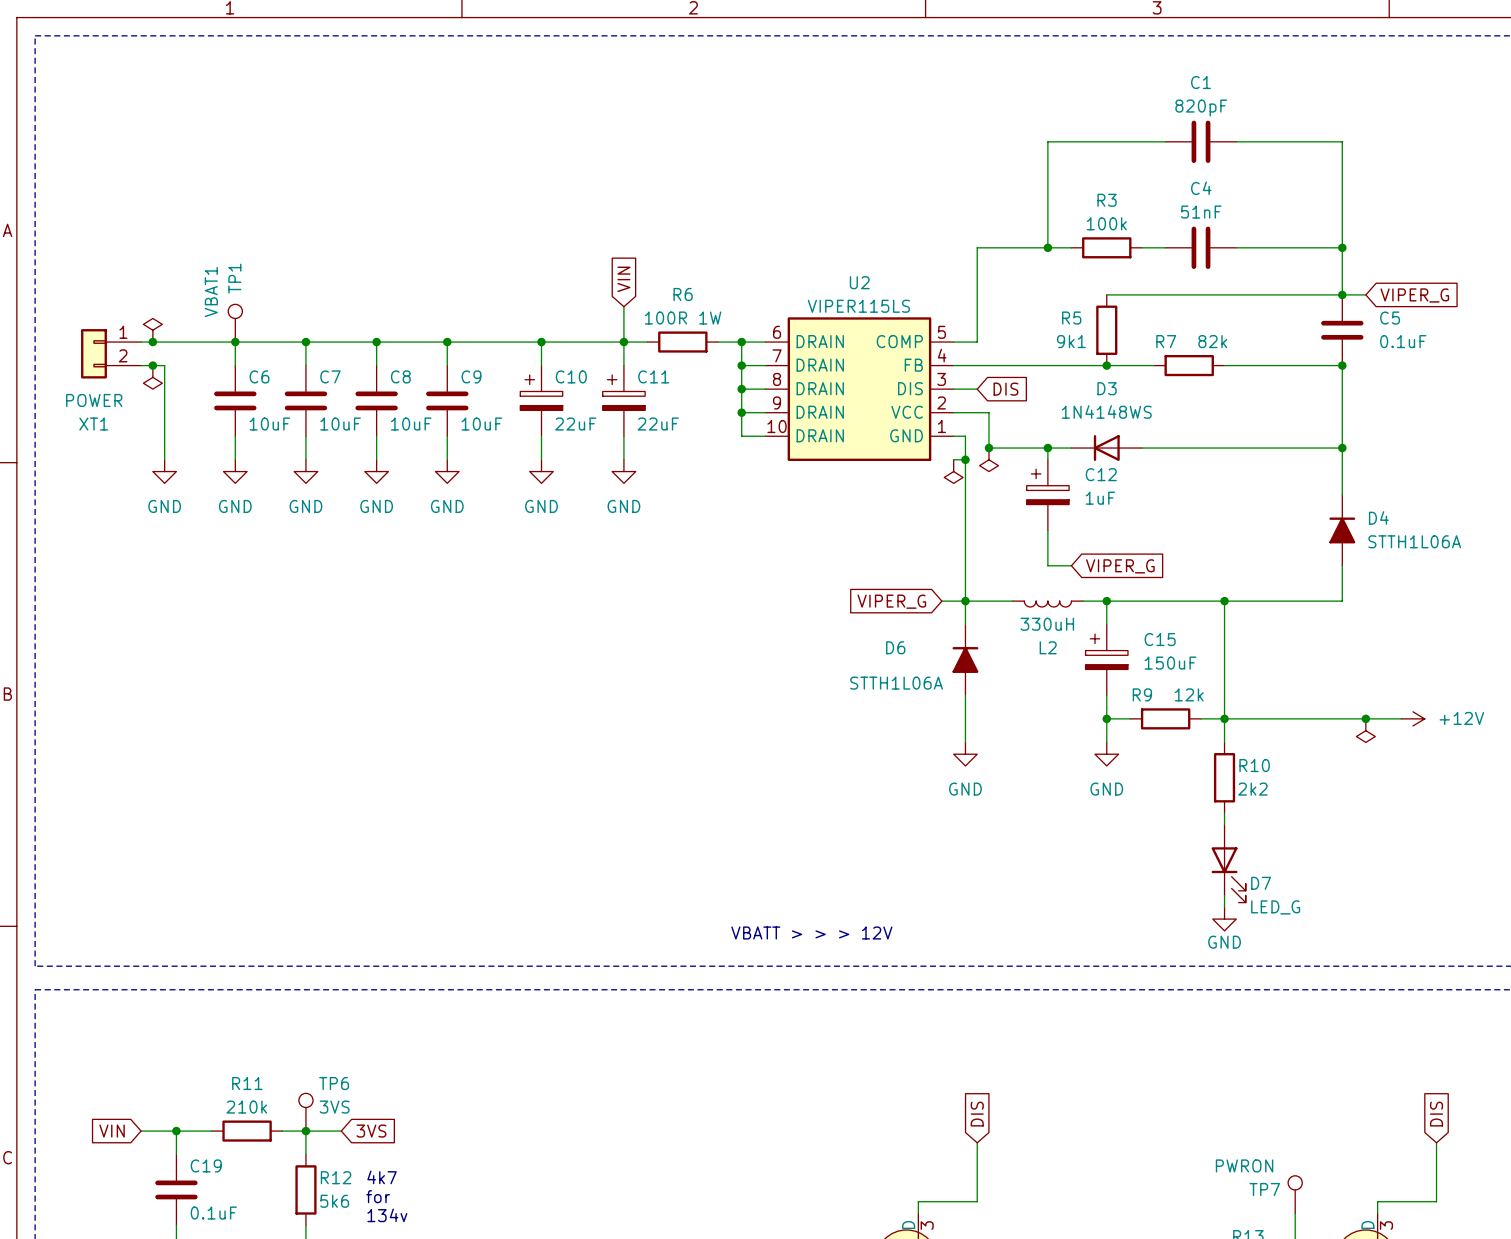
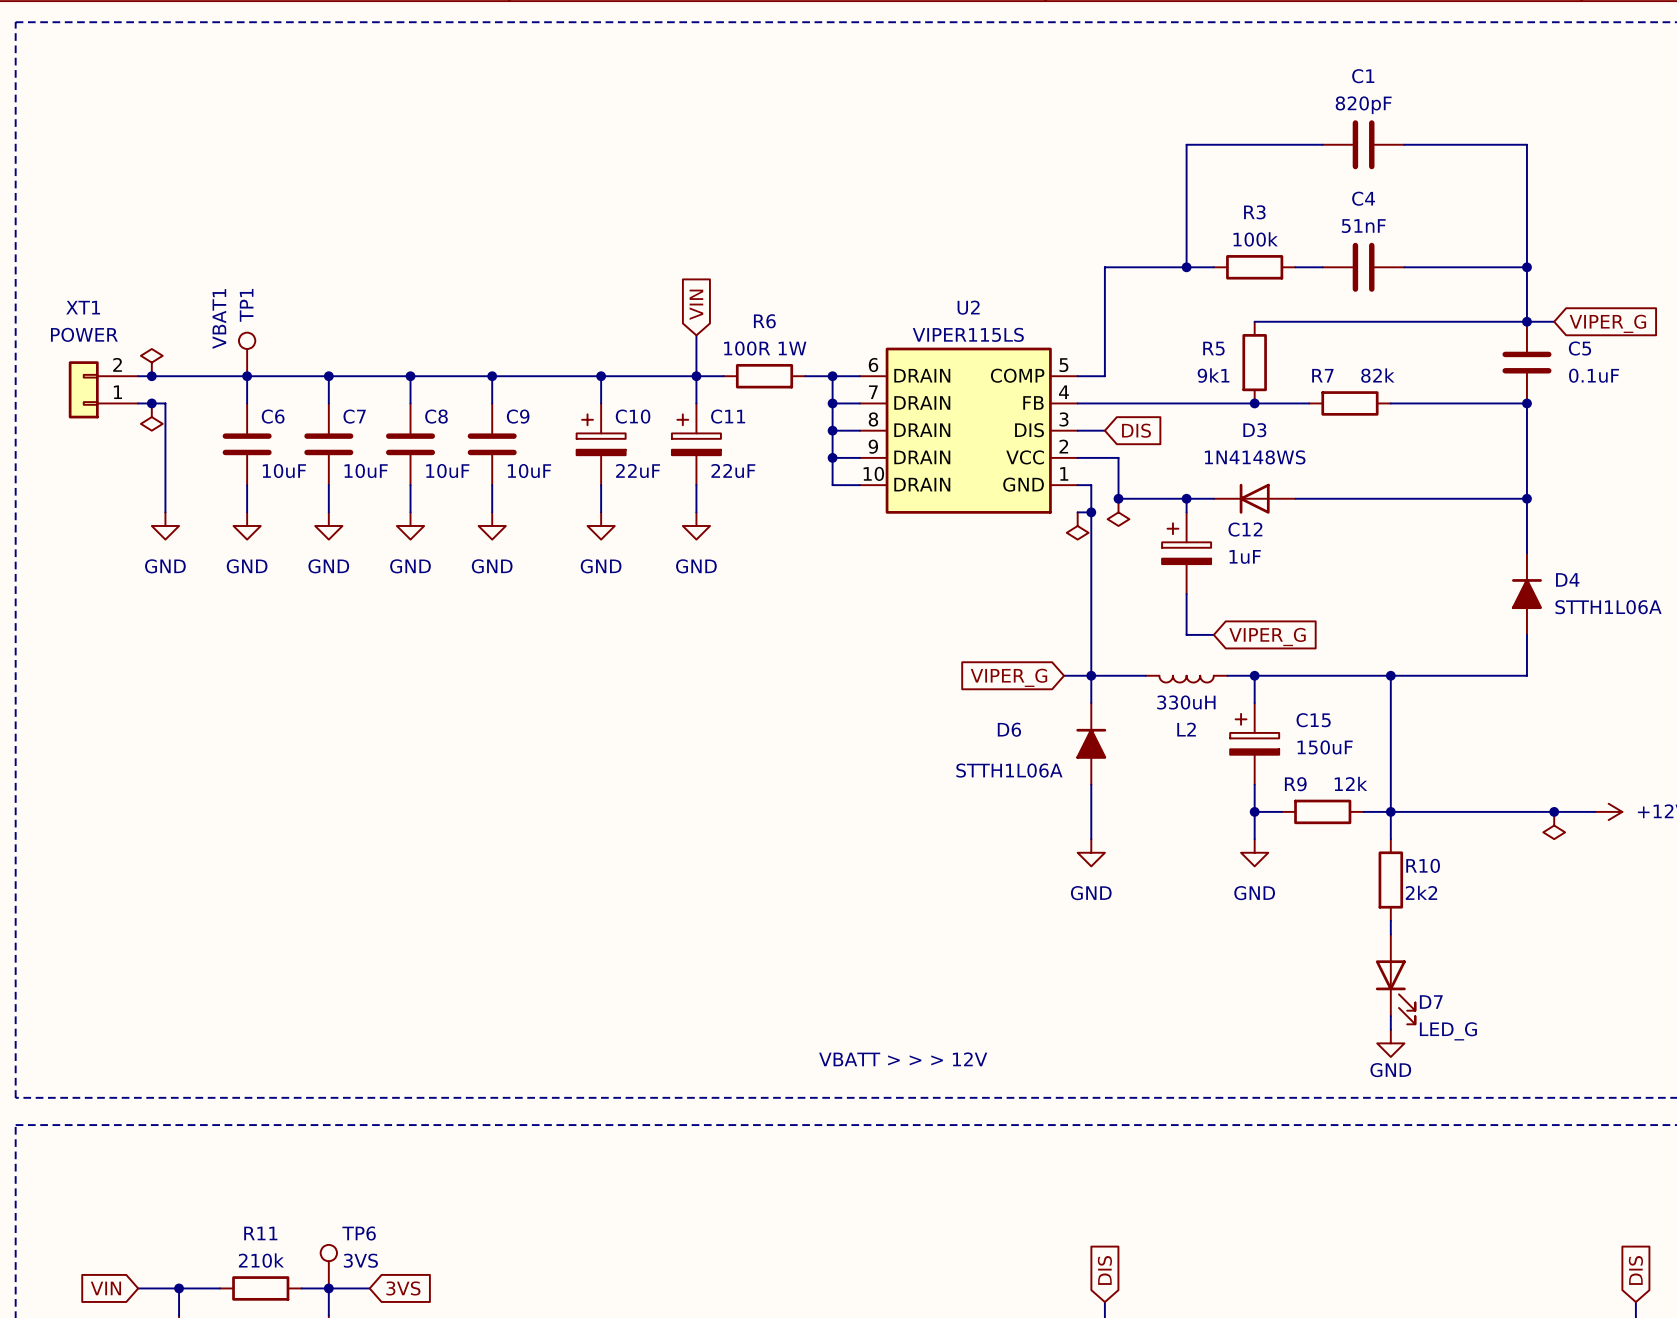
XT1 flip: as is (93, 353) -> up-down (83, 389)

